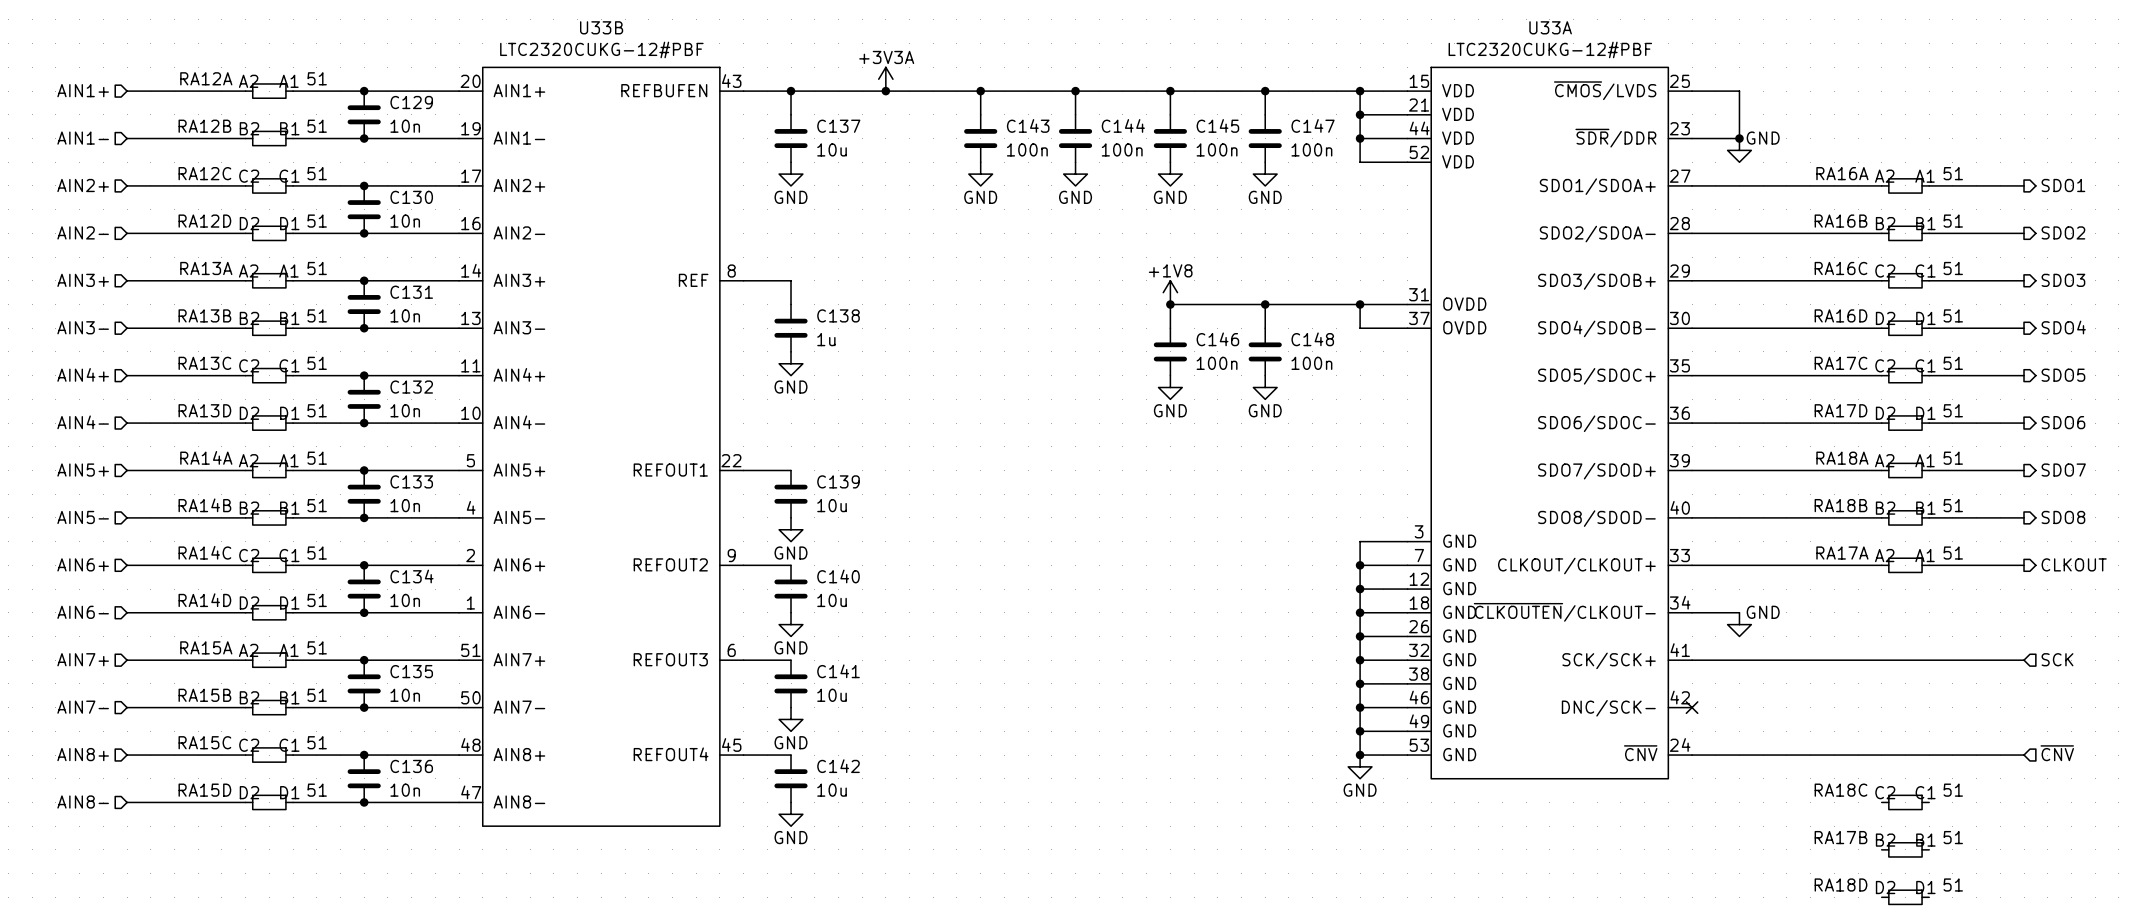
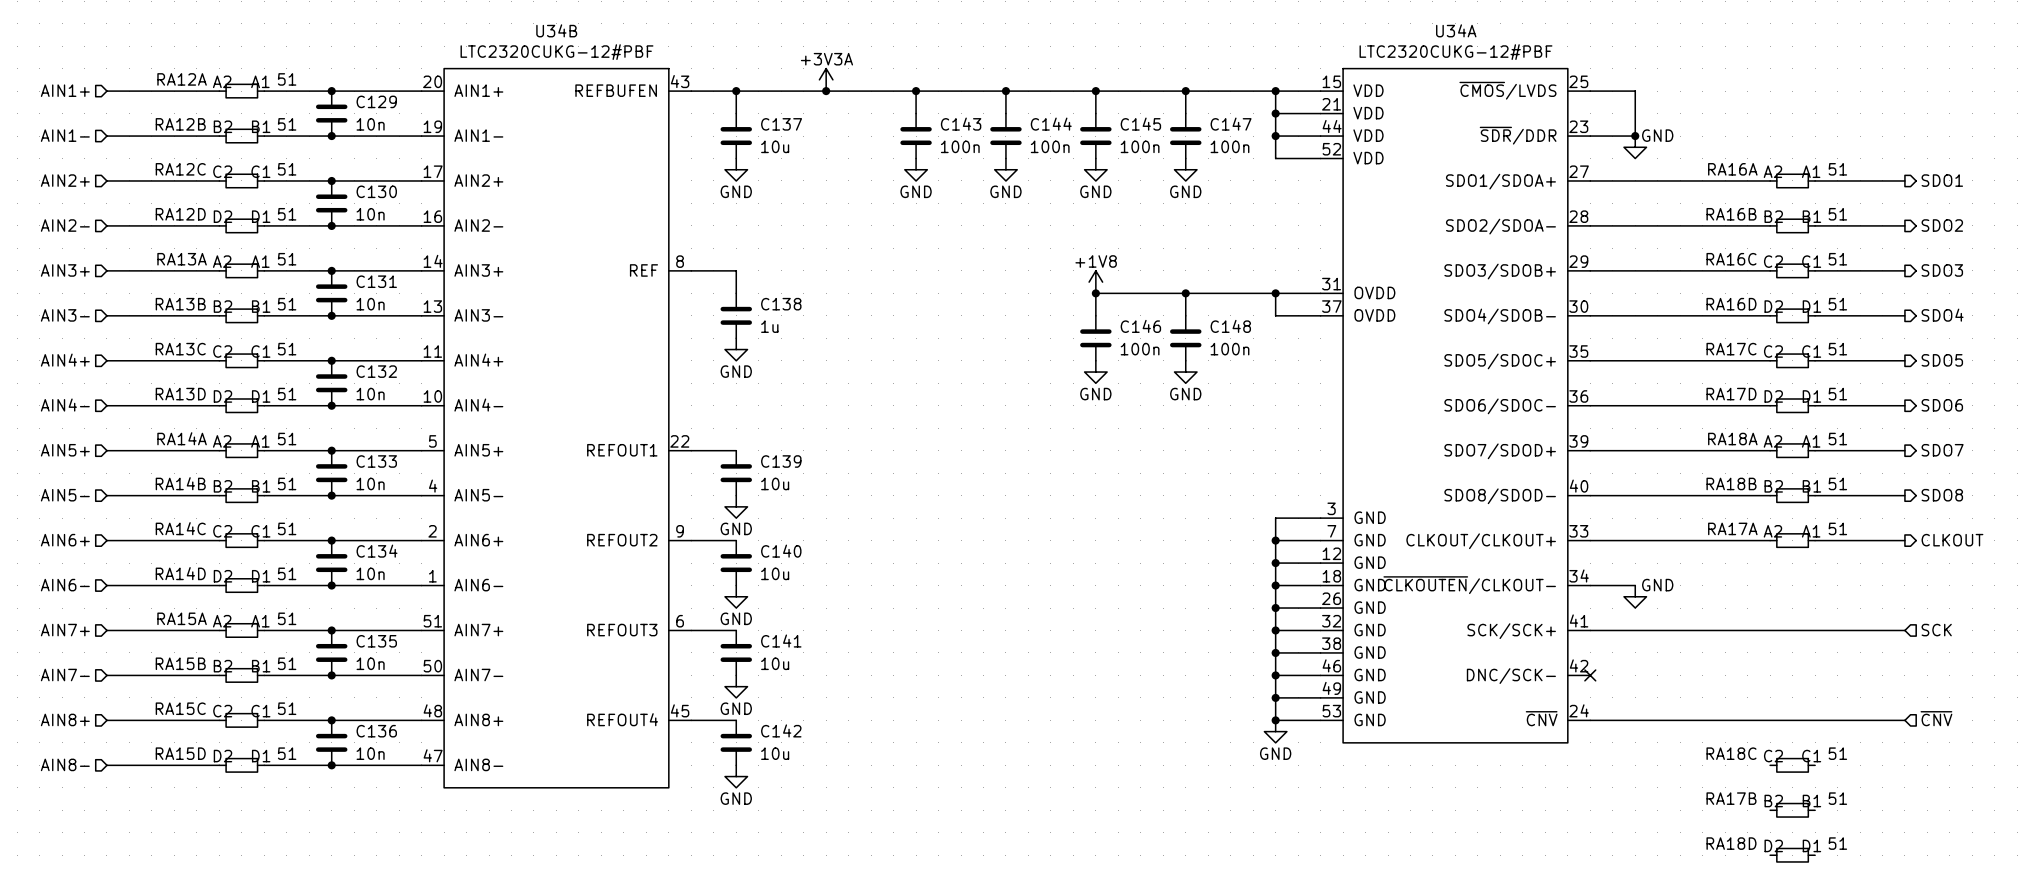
U33B name: U33B (601, 27) -> U34B (556, 30)
U33A name: U33A (1550, 27) -> U34A (1456, 30)

